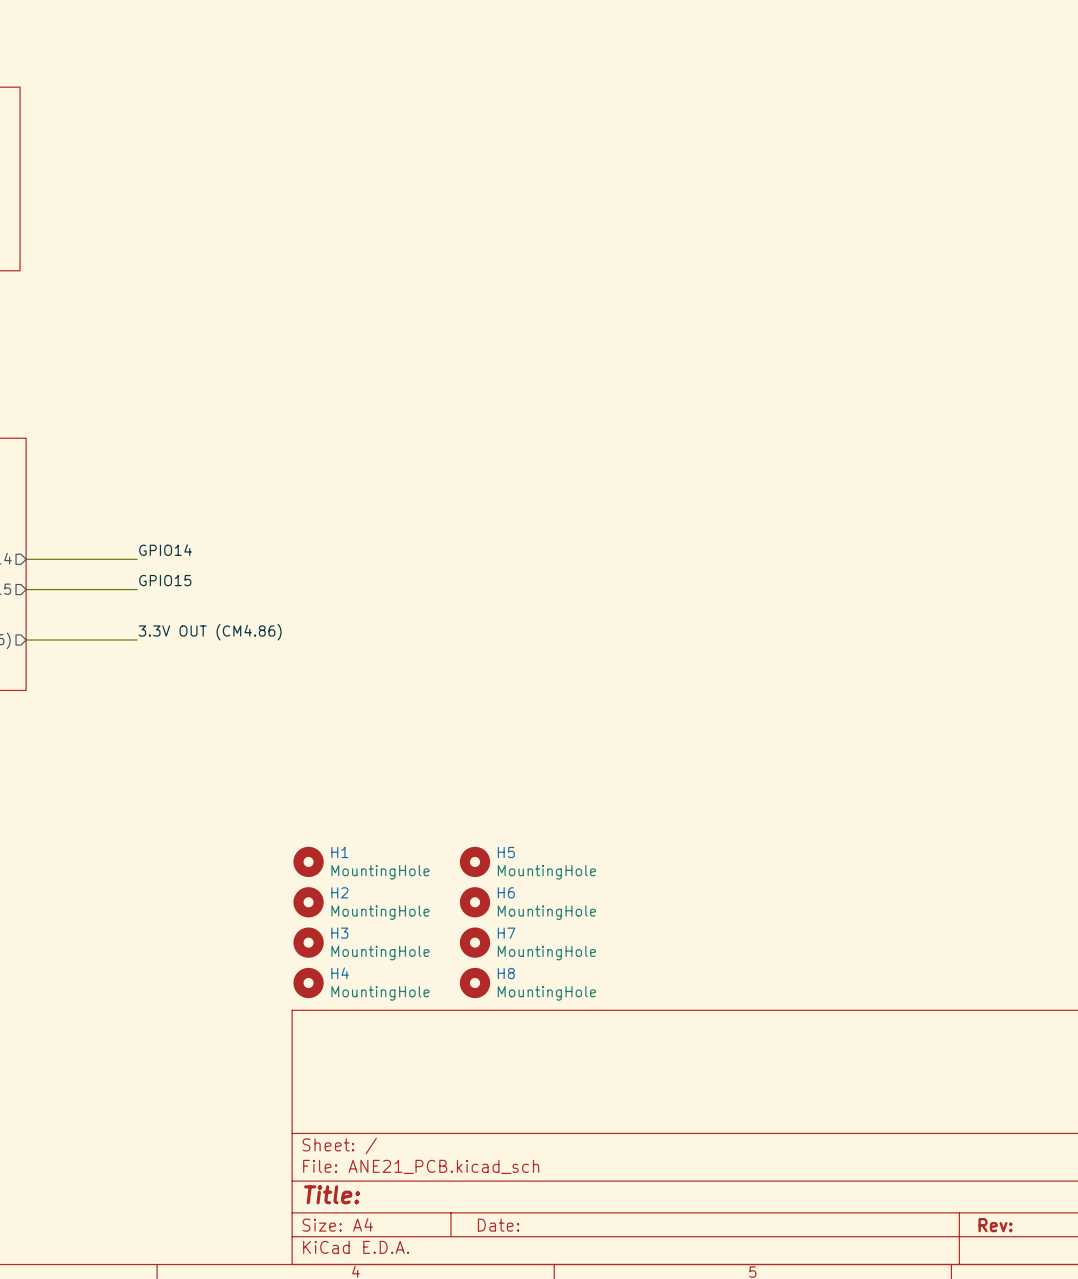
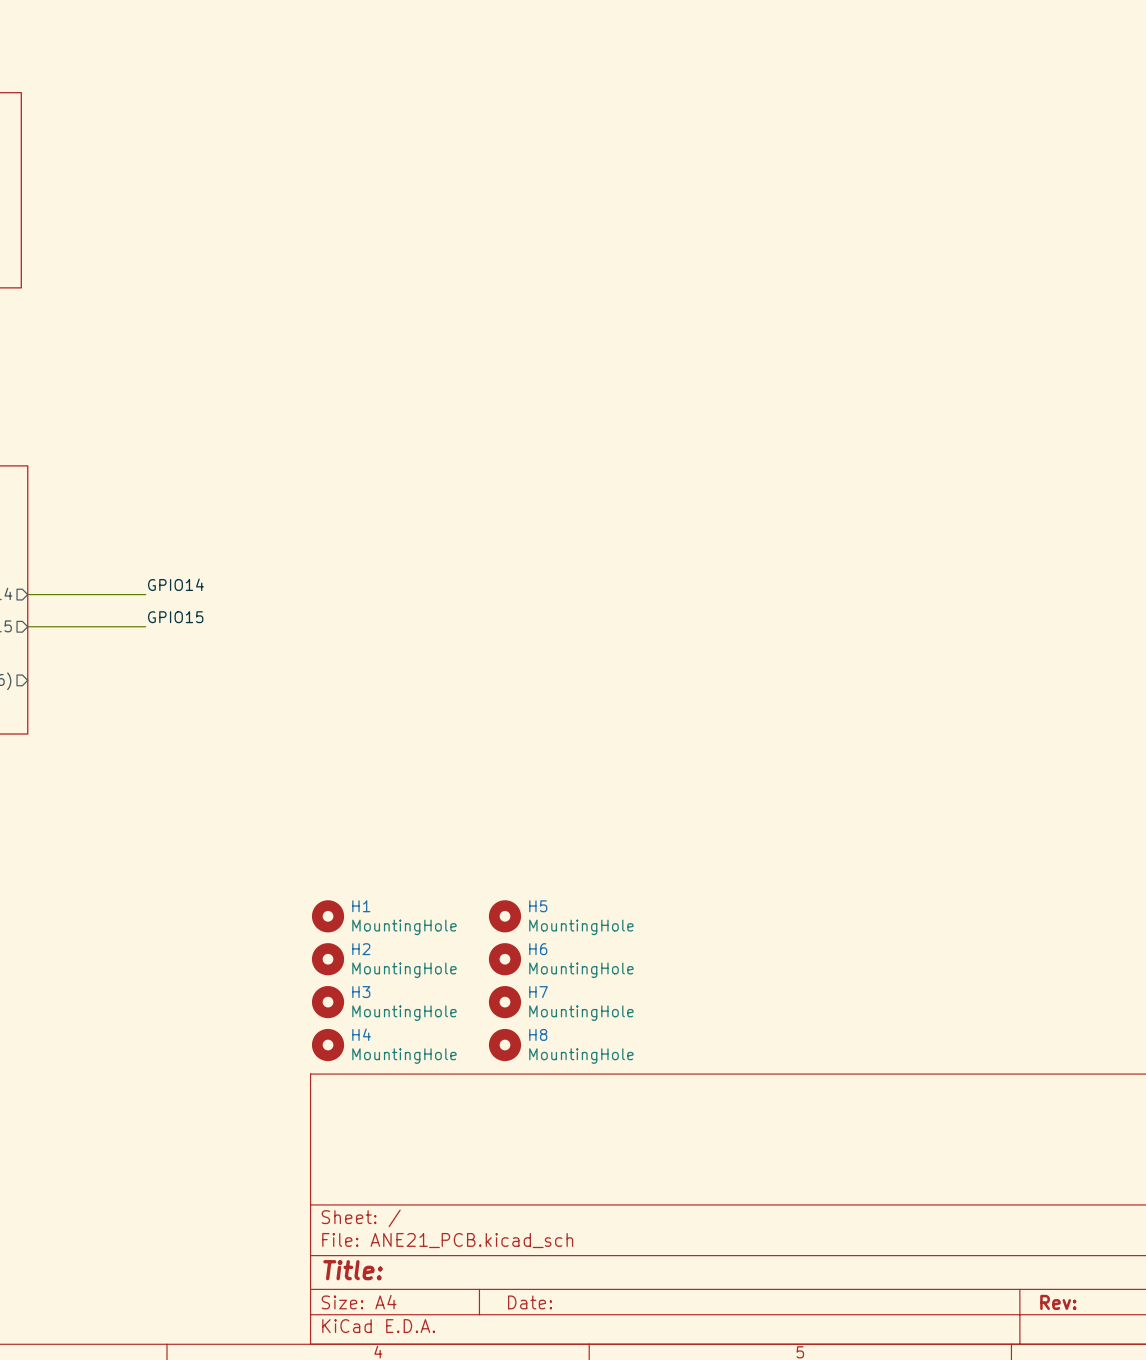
label: 3.3V OUT (CM4.86) (210, 632) -> none
wire: (26, 640) (137, 640) -> none

